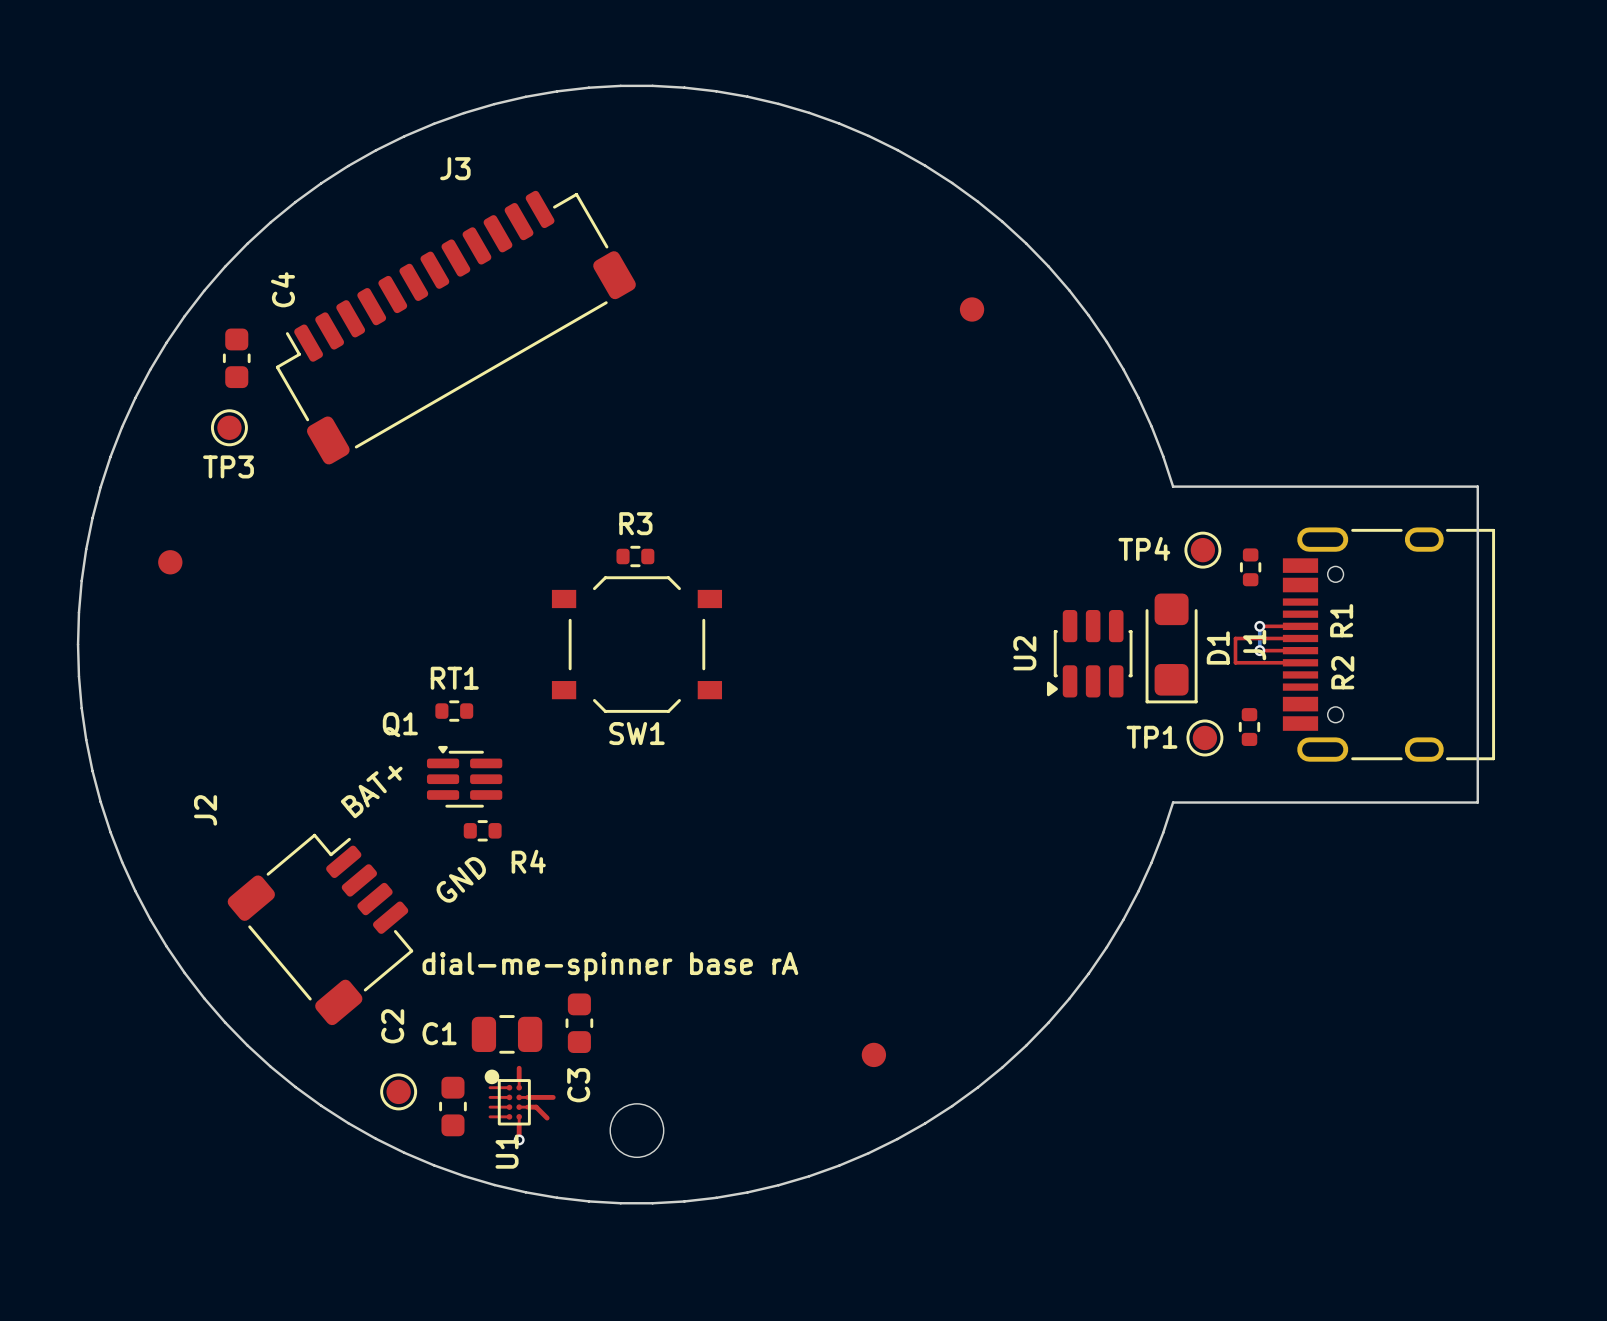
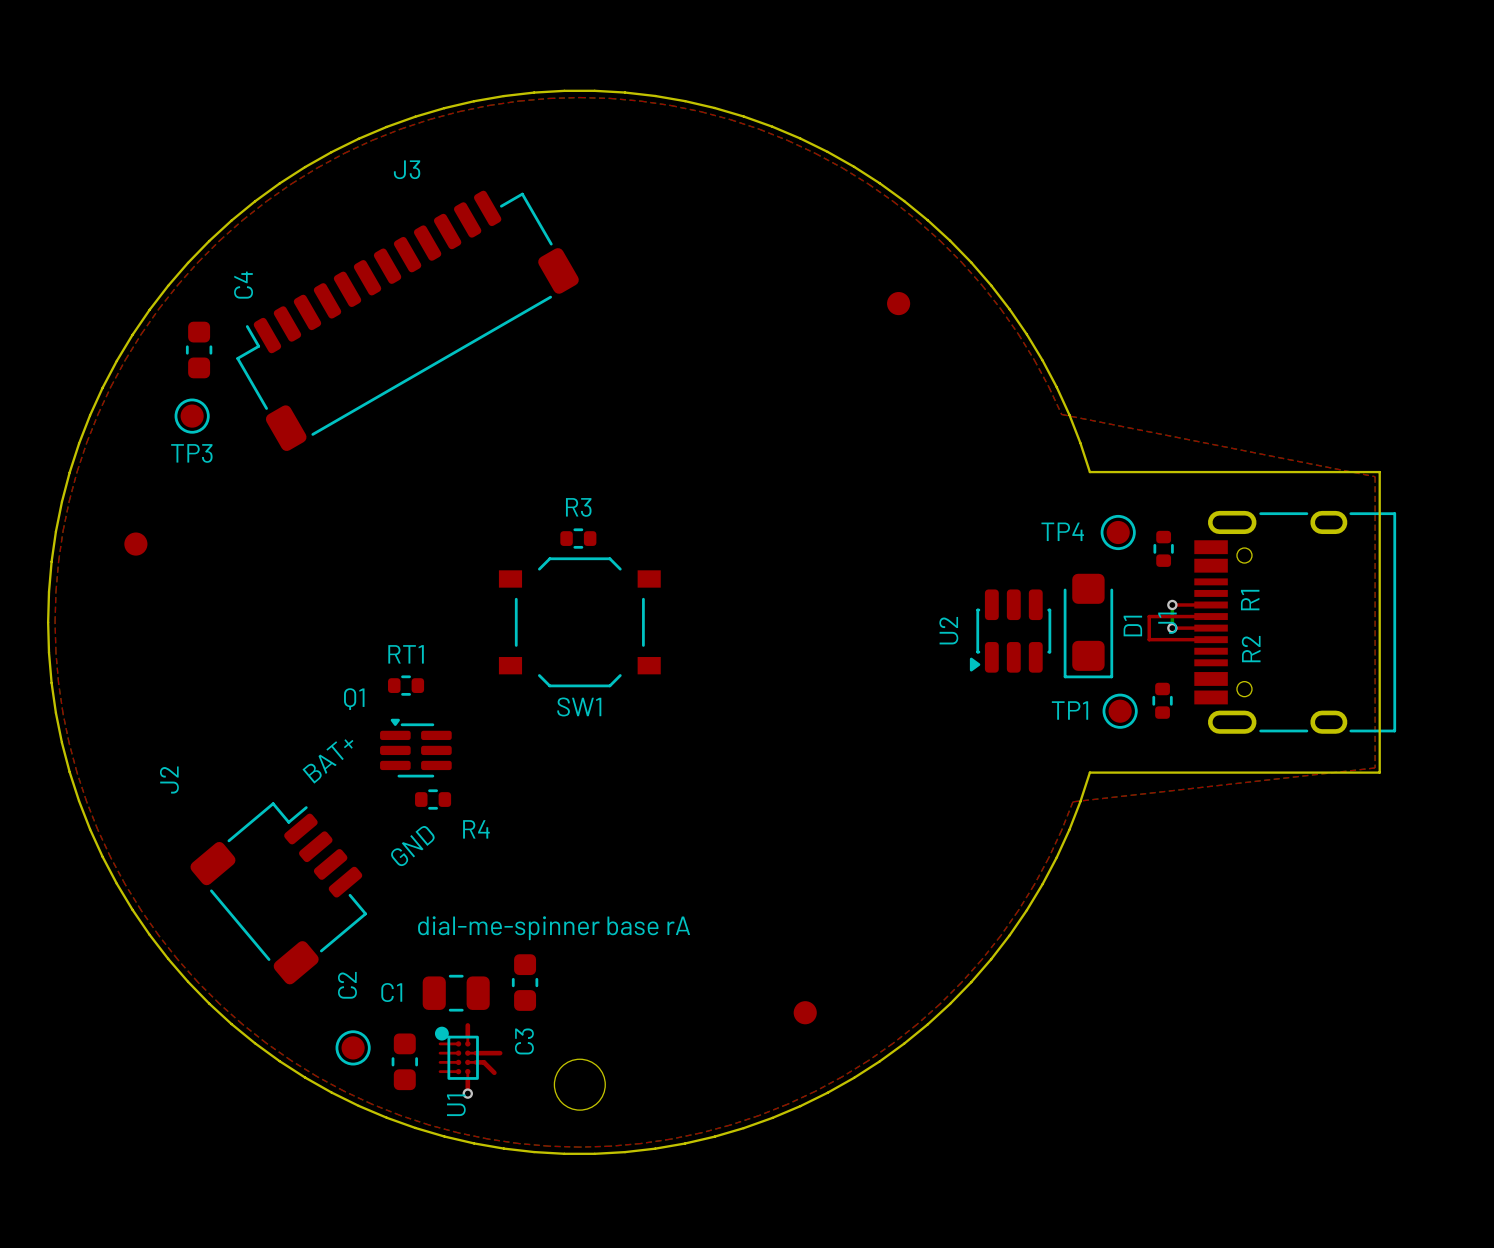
top zone outline: none -> (579, 97) (549, 98) (488, 105) (458, 111) (400, 129) (371, 140) (317, 167) (266, 201) (219, 240) (198, 262) (158, 308) (125, 359) (97, 414) (86, 442) (69, 501) (58, 561) (55, 622) (55, 652) (63, 713) (69, 743) (86, 801) (97, 830) (125, 884) (158, 935) (198, 982) (219, 1004) (266, 1043) (317, 1076) (371, 1104) (400, 1115) (458, 1132) (518, 1143) (579, 1147) (610, 1146) (670, 1139) (700, 1132) (759, 1115) (787, 1104) (842, 1076) (893, 1043) (939, 1004) (961, 982) (1000, 935) (1034, 884) (1061, 830) (1072, 801) (1375, 767) (1375, 476) (1061, 414) (1034, 359) (1000, 308) (981, 285) (939, 240) (893, 201) (868, 183) (842, 167) (787, 140) (730, 119) (700, 111) (640, 101) (579, 97)

